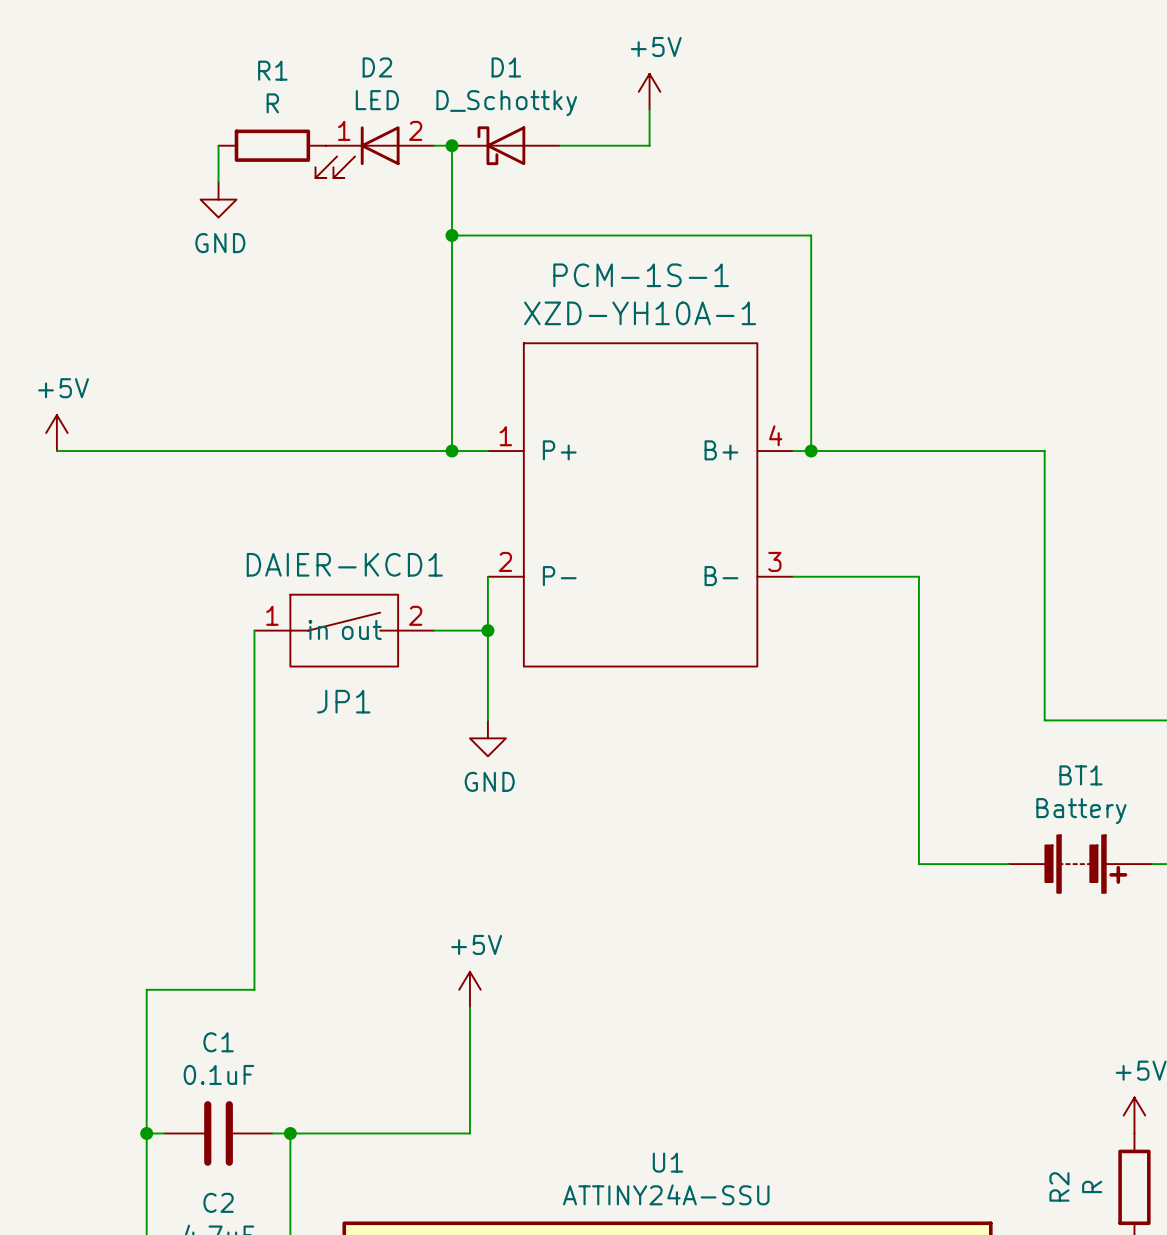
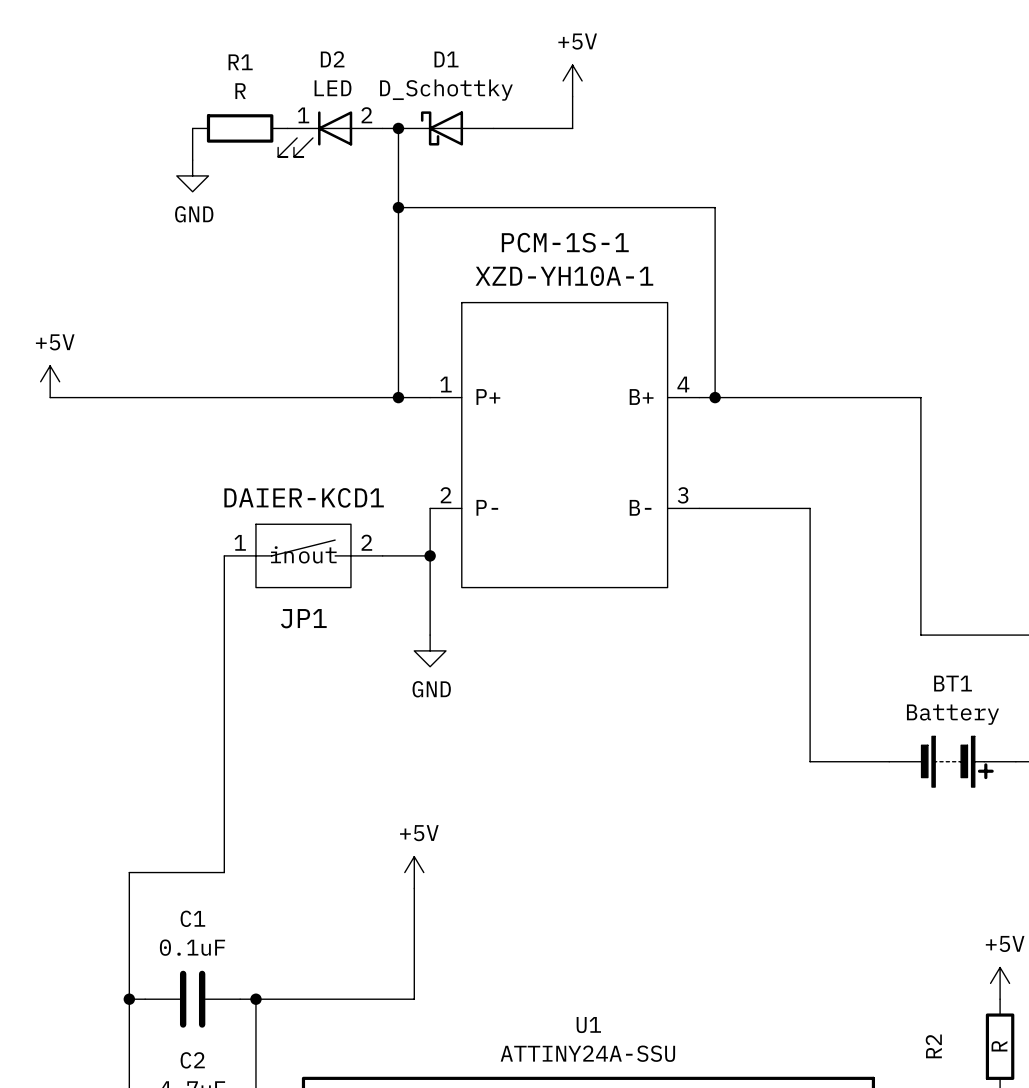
R2 value position: R (1092, 1186) -> R (999, 1046)

